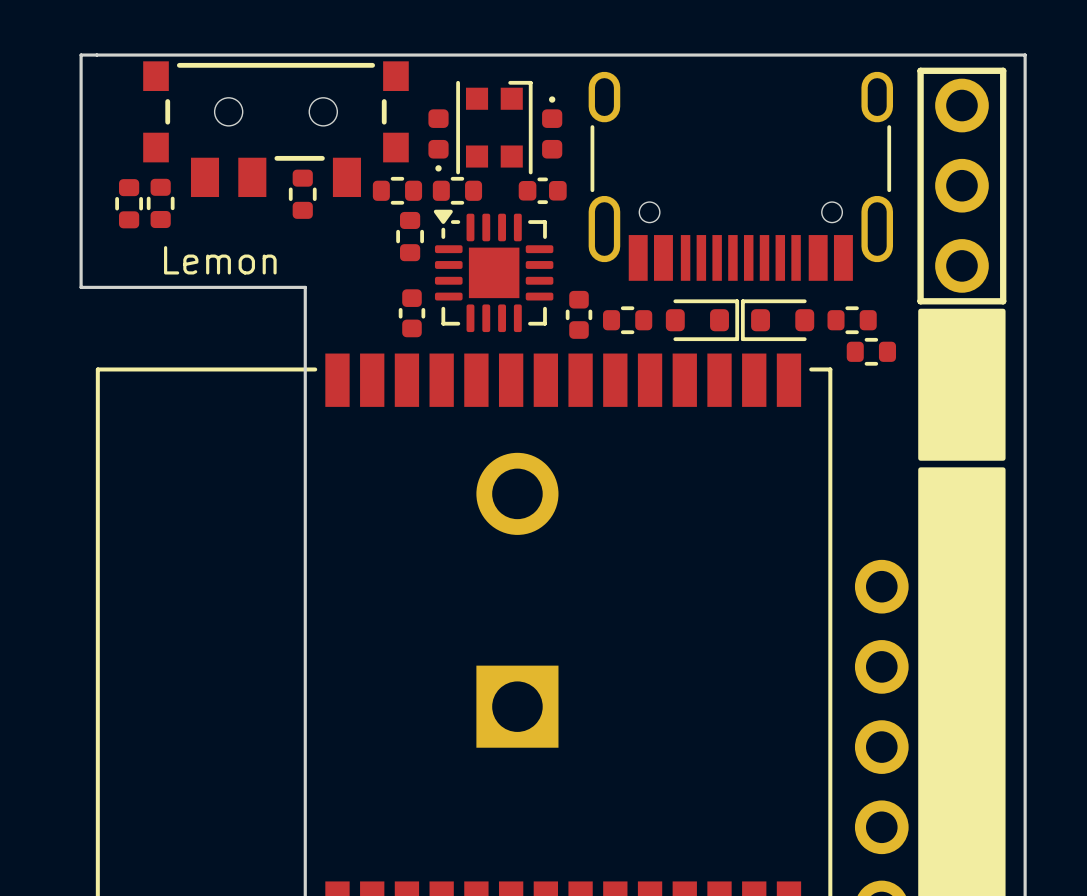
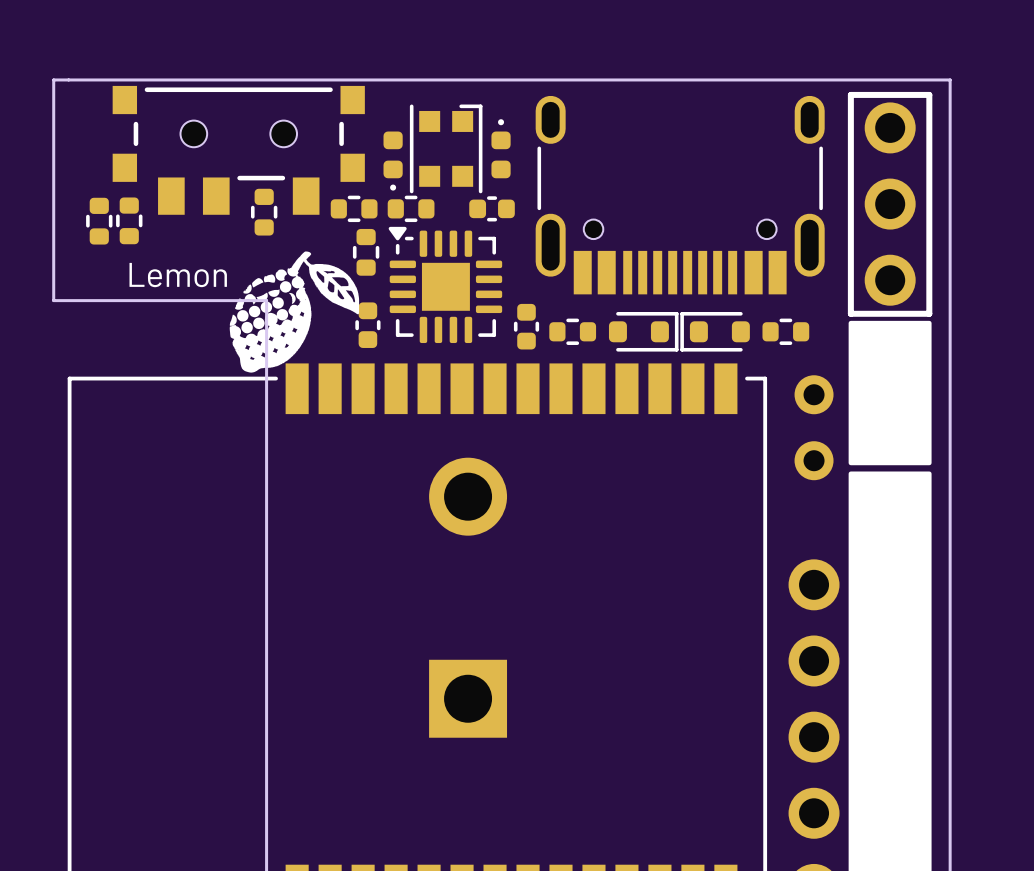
drawing: none -> [229, 251, 360, 373]
part: (871, 351) -> none
part: none -> (814, 394)
part: none -> (814, 460)

